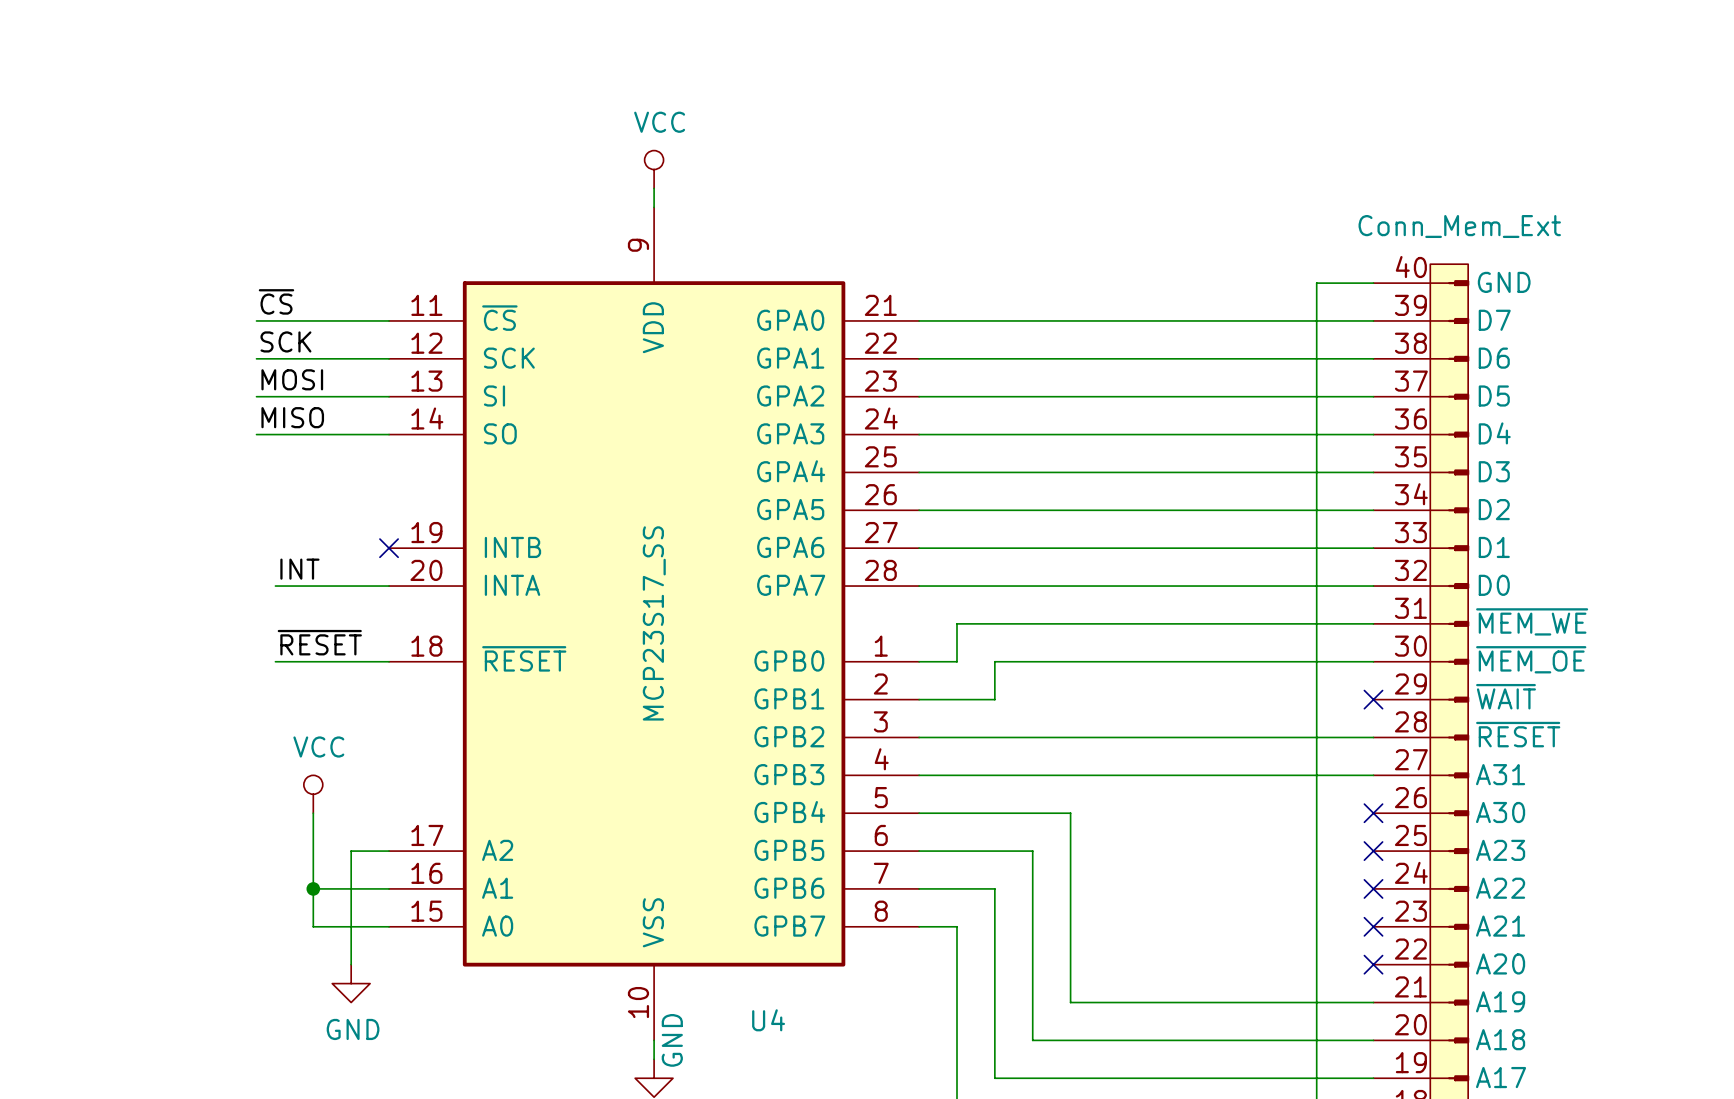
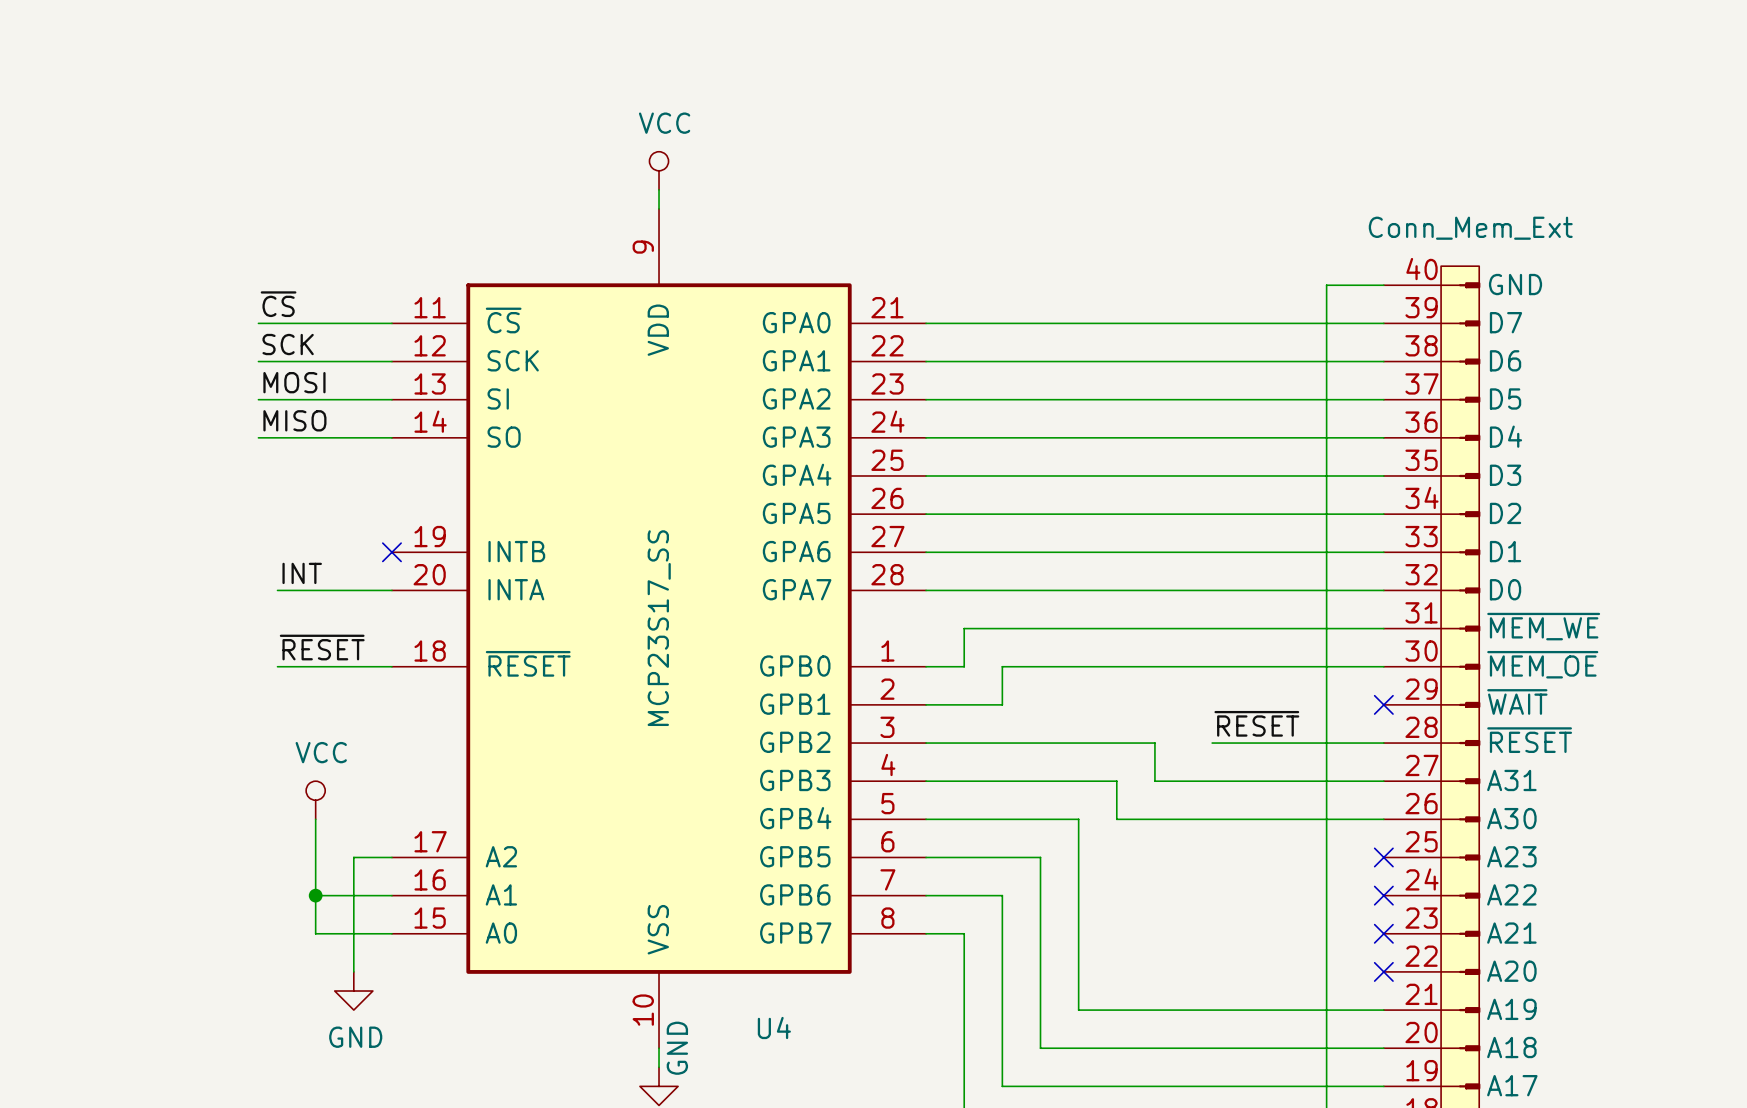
label: none -> ~{RESET} (1256, 723)
wire: (1146, 737) (1203, 737) -> none
wire: (1108, 775) (1146, 775) -> (1154, 743) (1154, 781)
wire: none -> (1116, 781) (1116, 819) (1383, 819)
no-connect mark: (1373, 813) -> none

